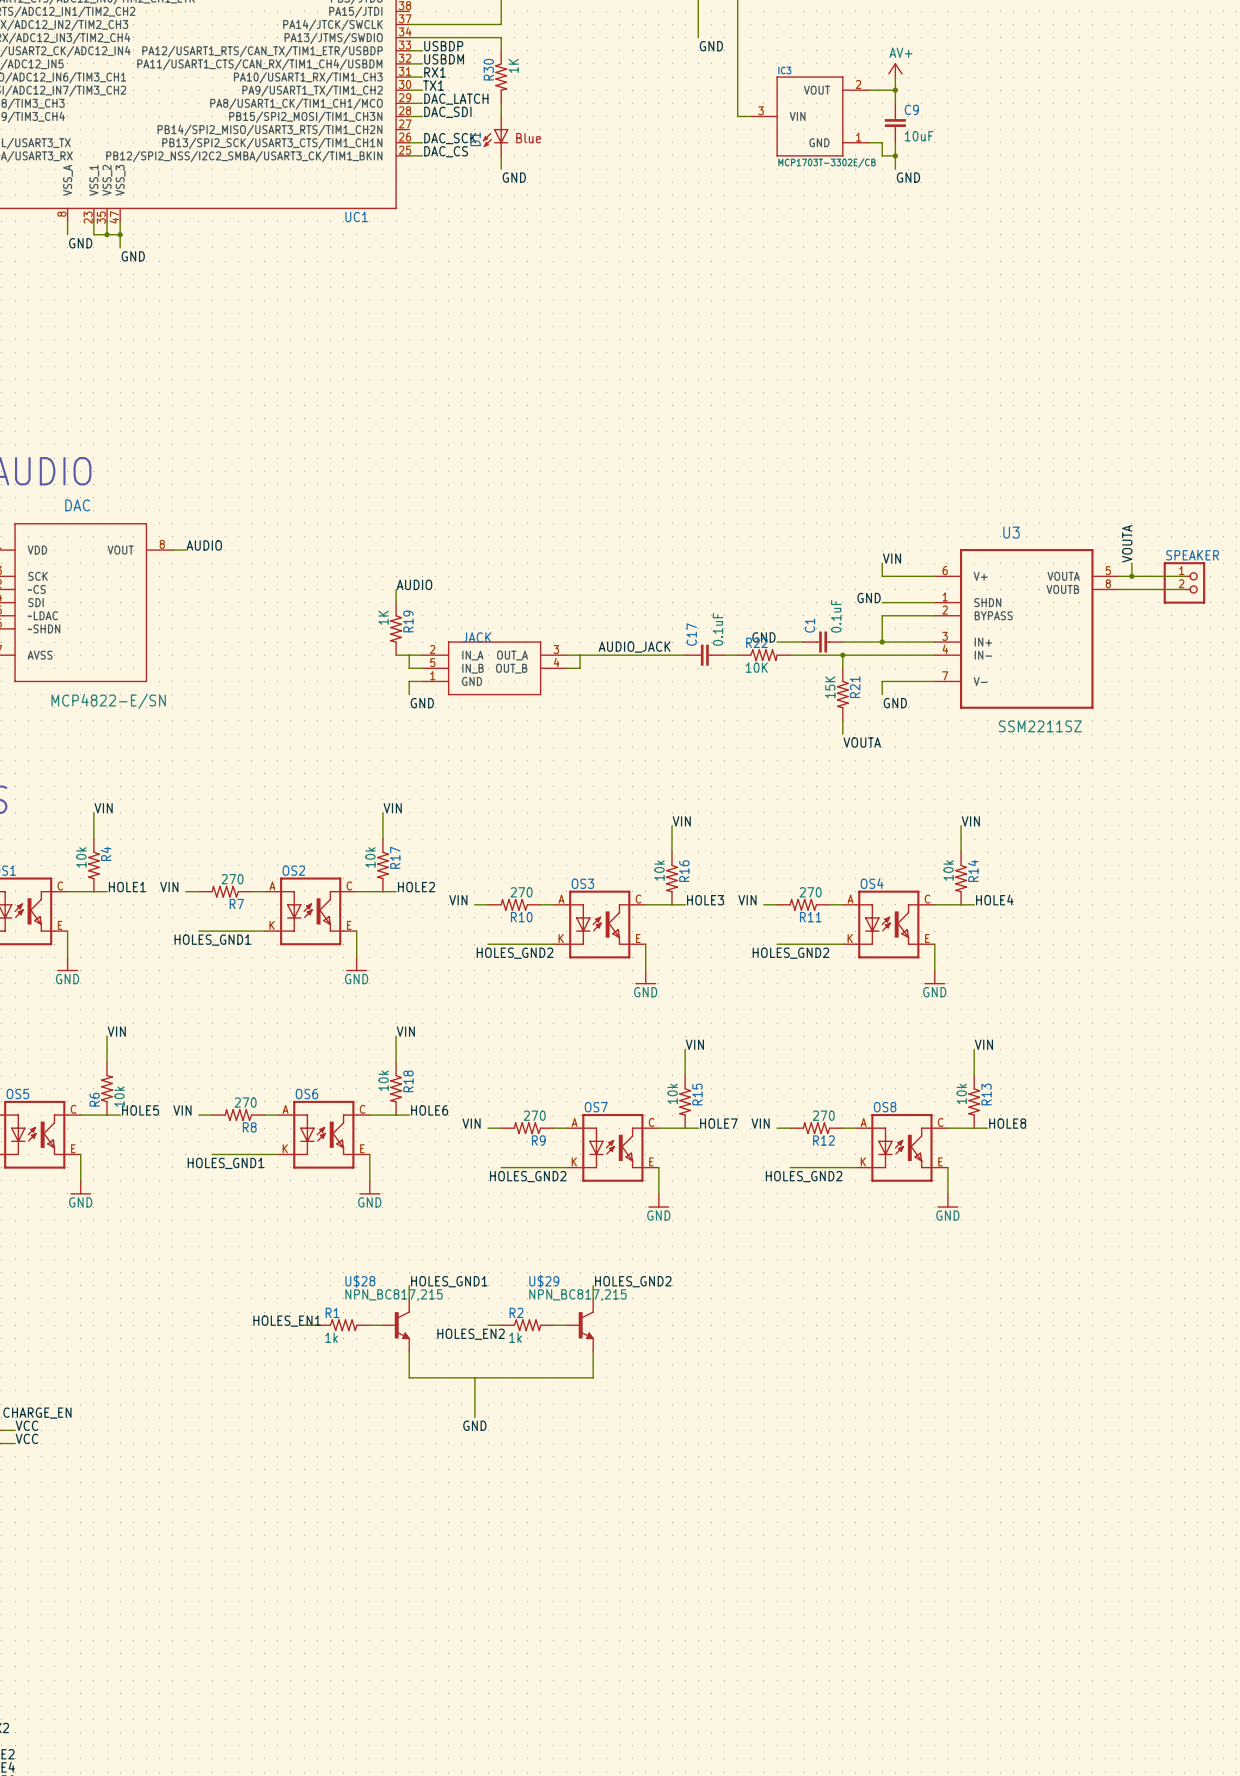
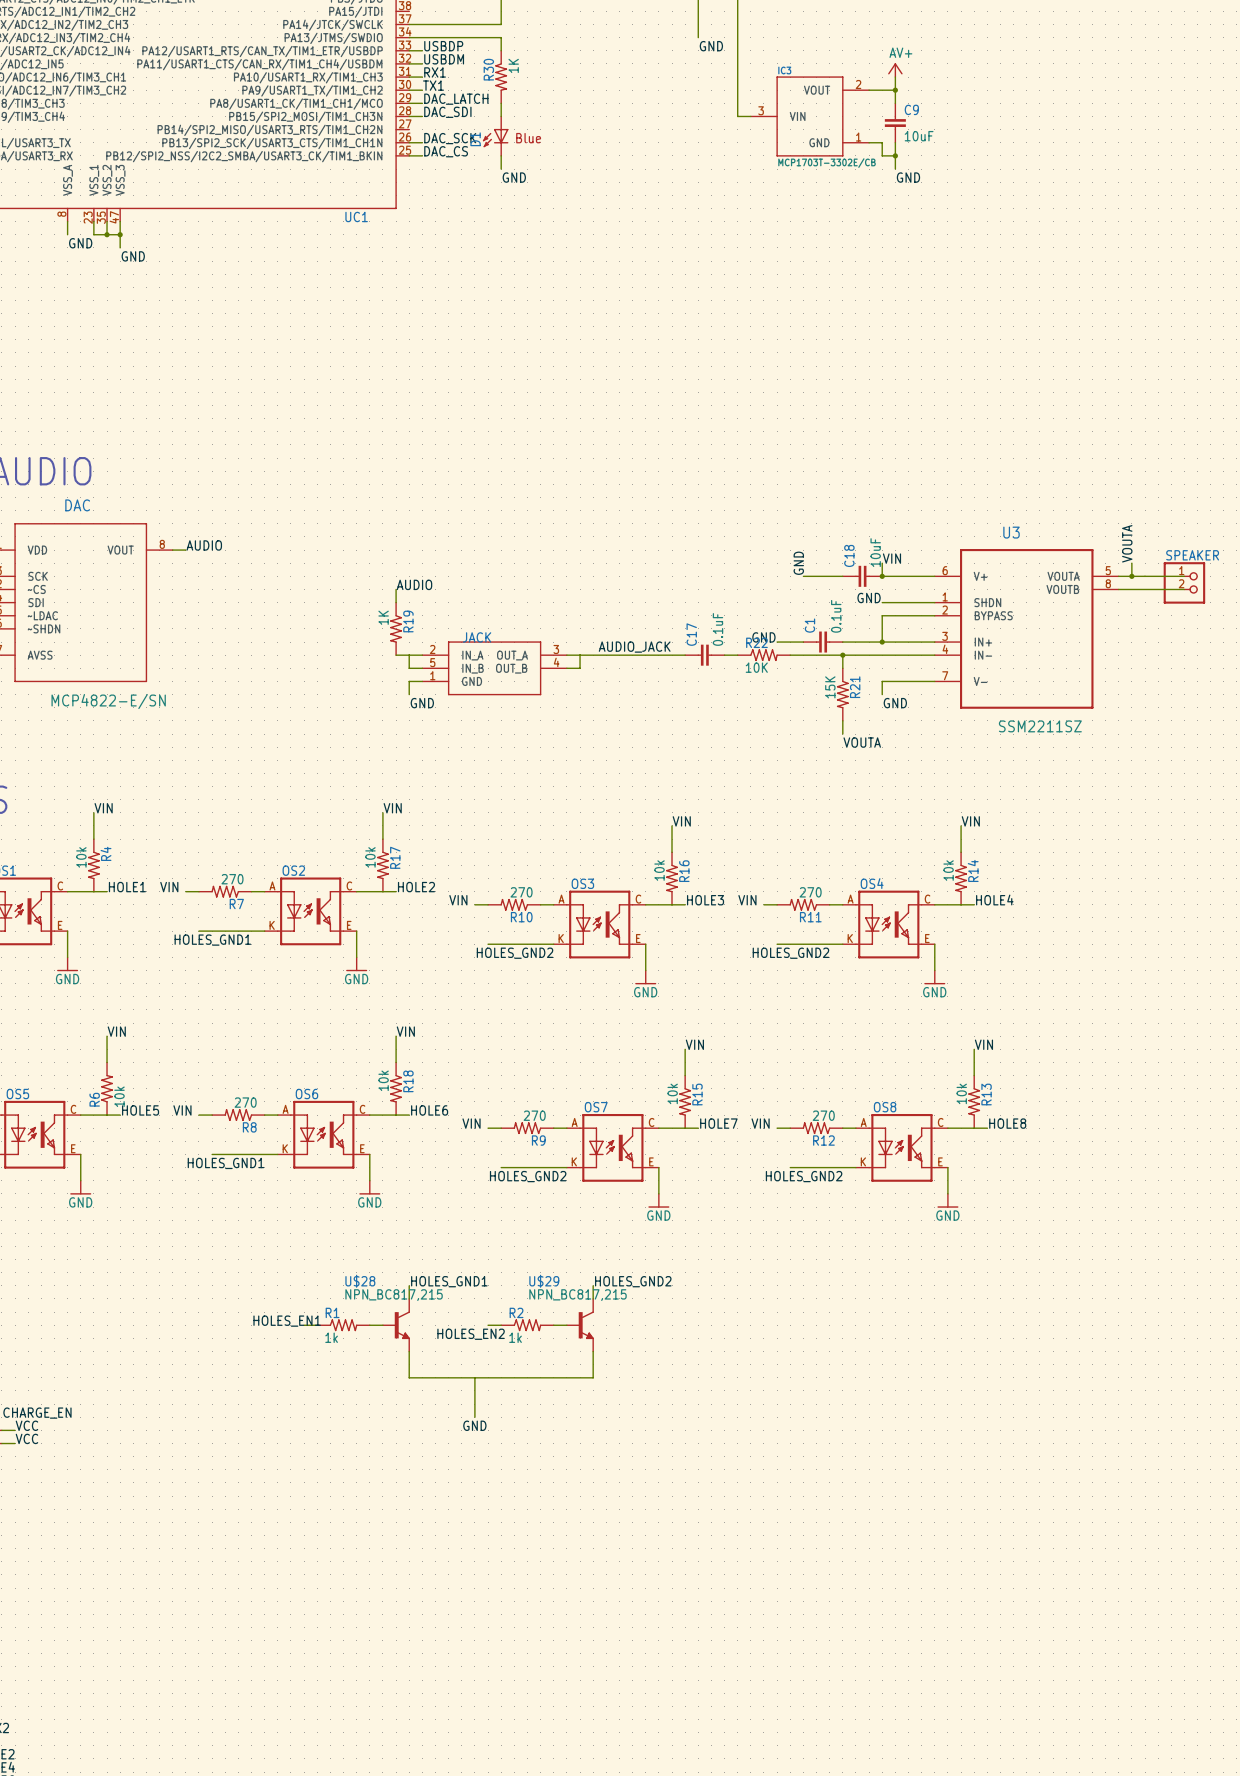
label: none -> GND (798, 563)
wire: none -> (803, 576) (842, 576)
C18: none -> 10uF (862, 576)
junction: none -> (882, 576)

